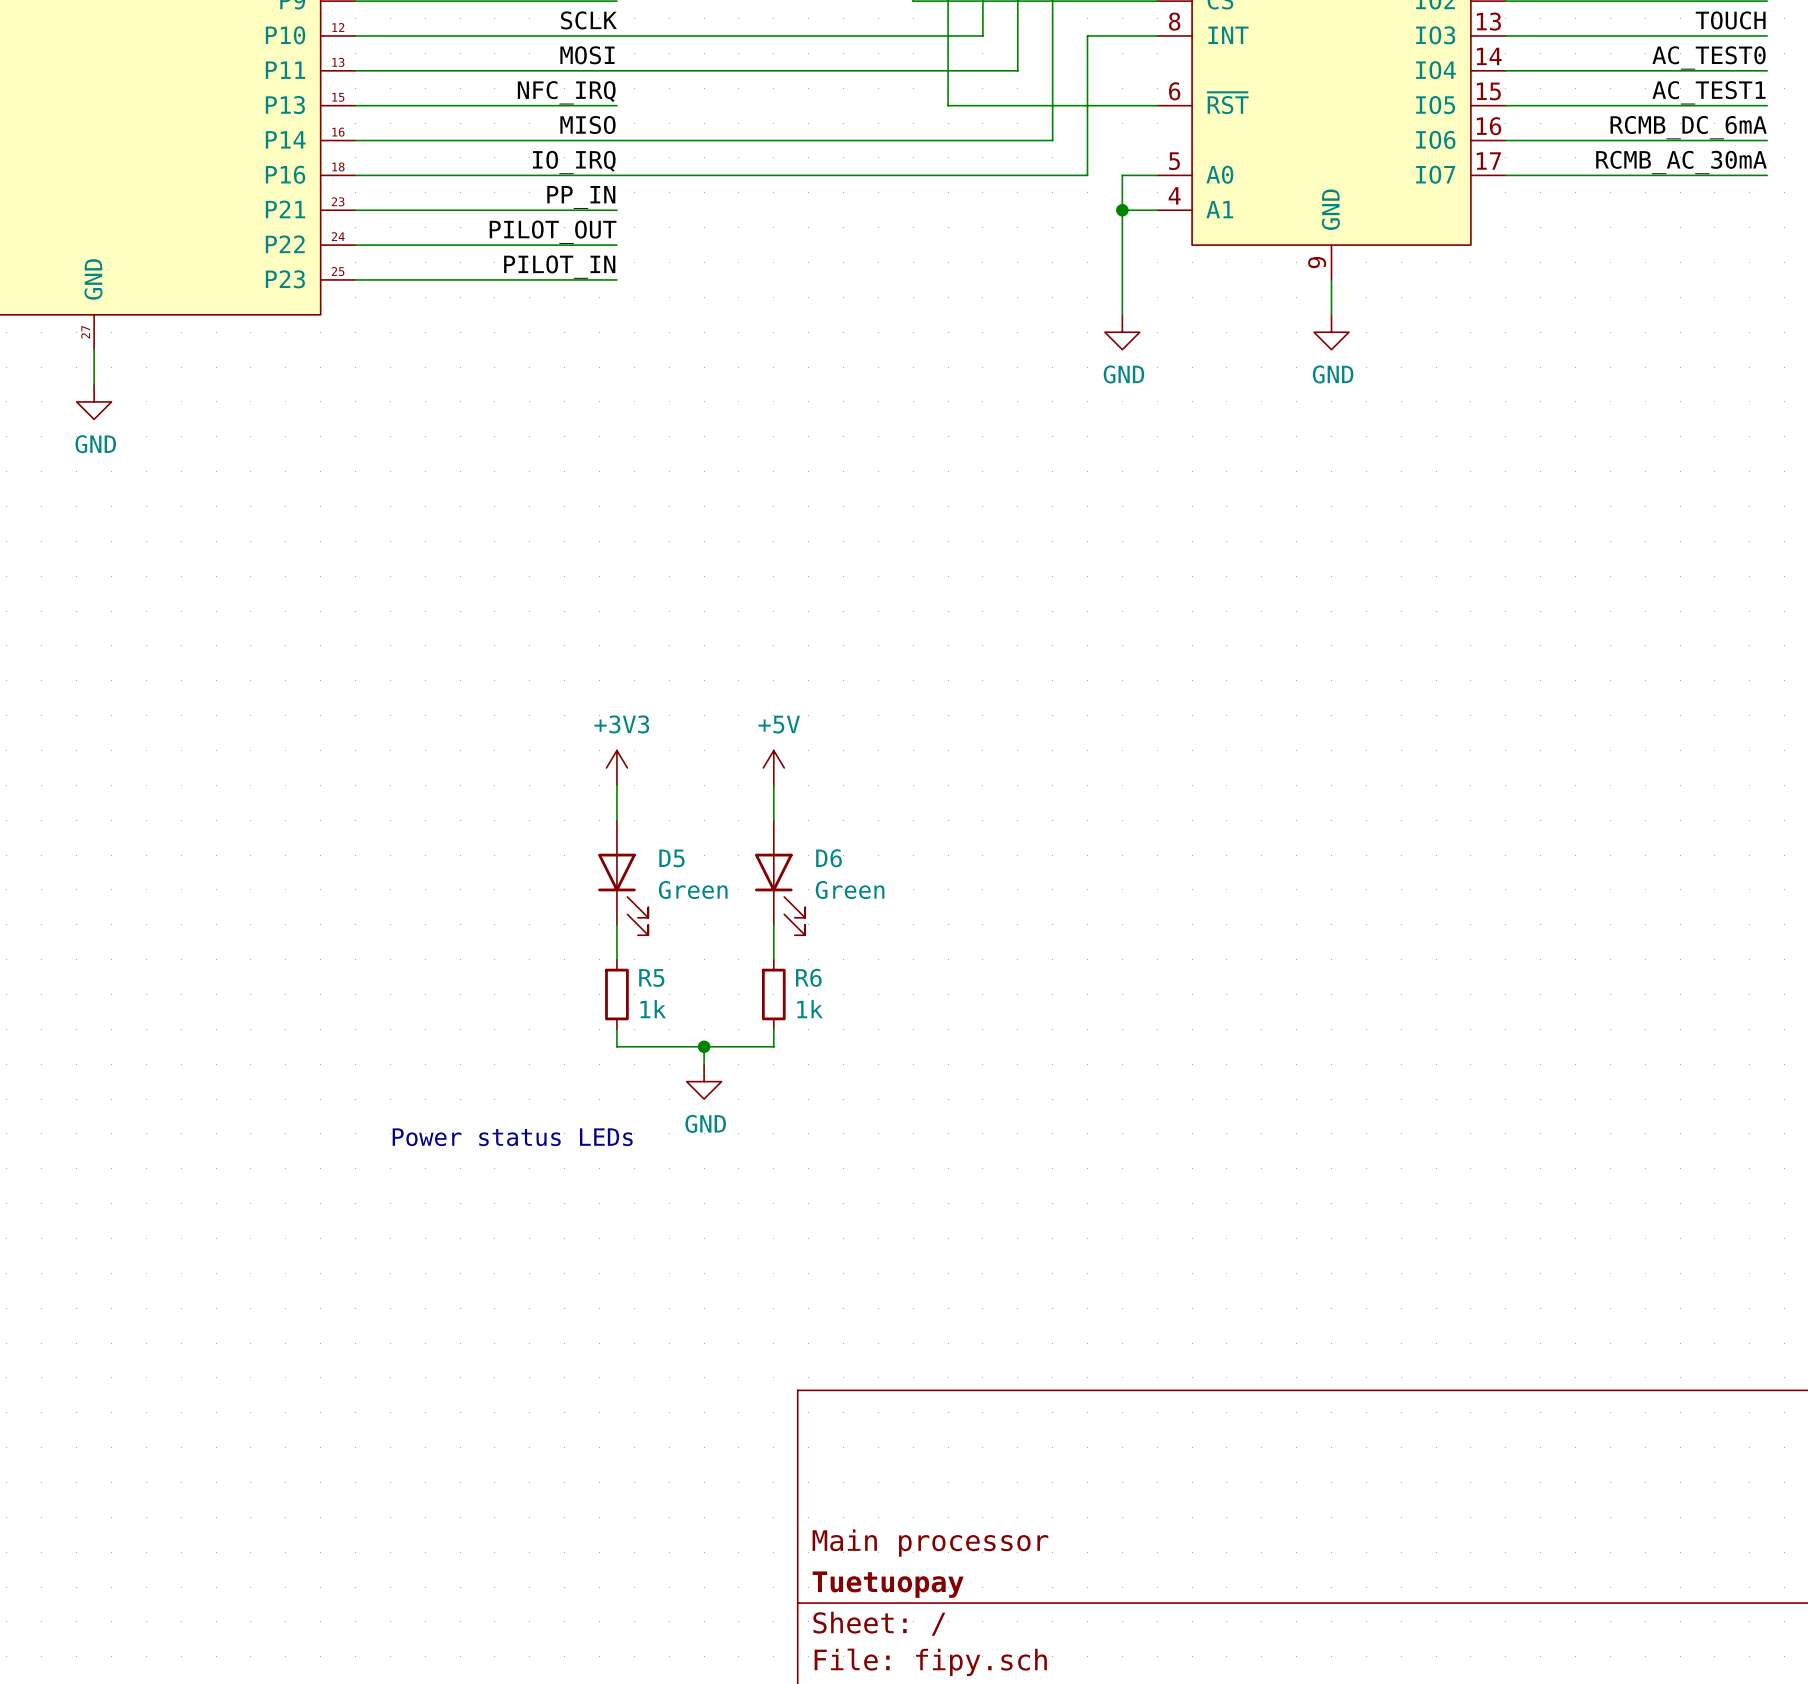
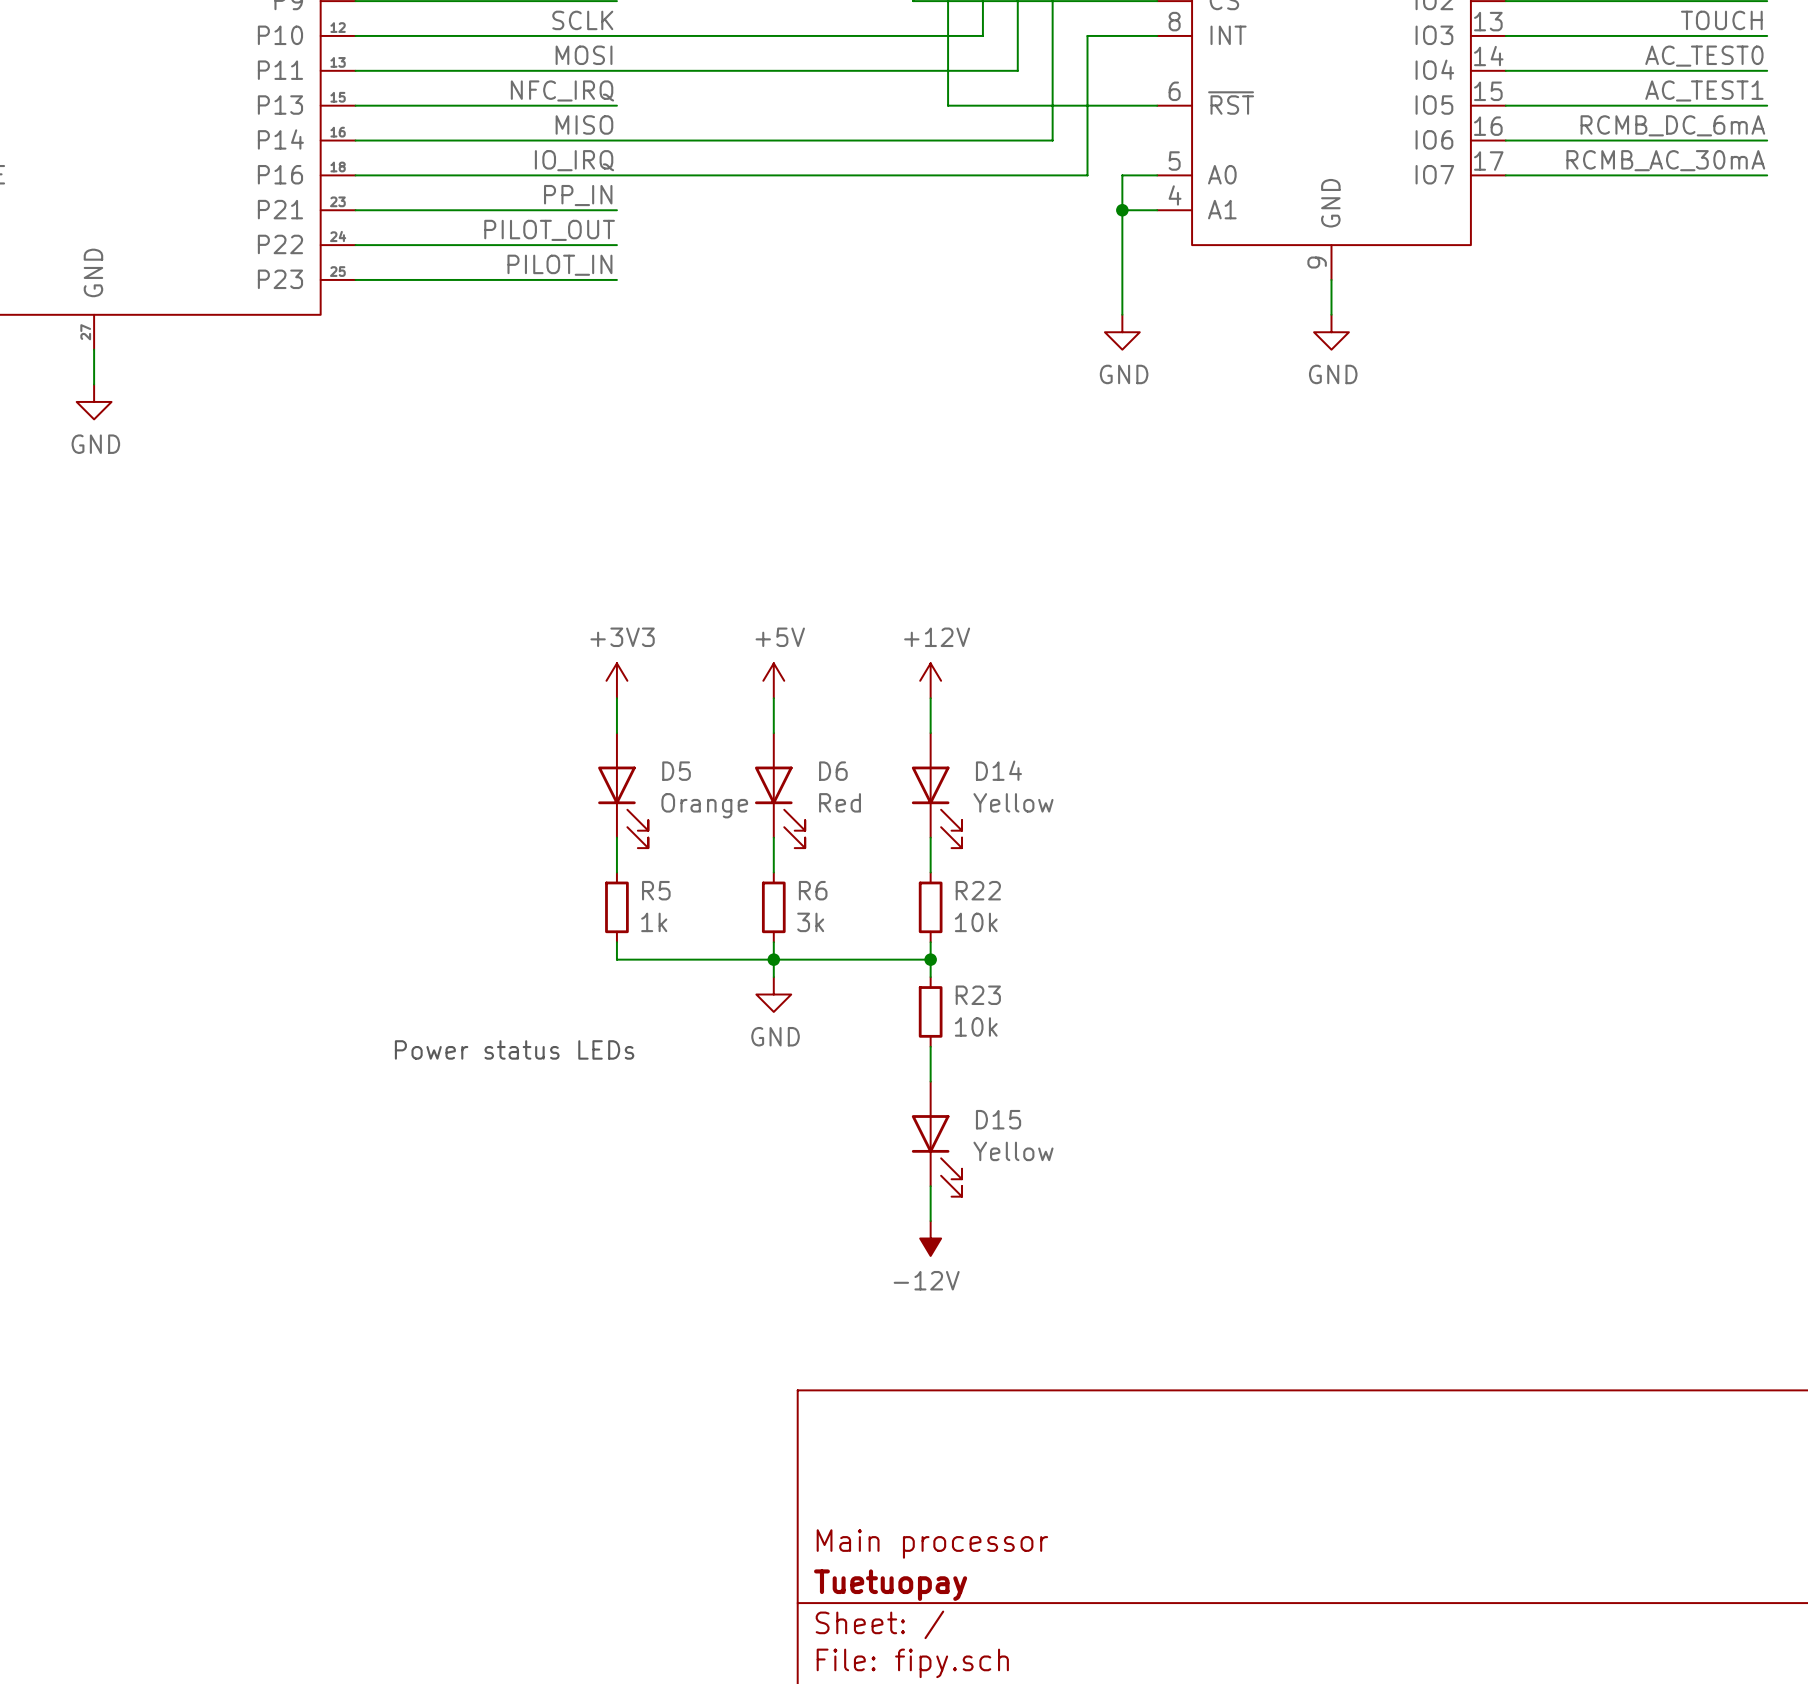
power symbol: none -> +12V (930, 680)
wire: none -> (616, 698) (616, 733)
wire: none -> (773, 698) (773, 733)
wire: none -> (930, 698) (930, 733)
power symbol position: +3V3 (616, 767) -> +3V3 (616, 680)
power symbol position: +5V (773, 767) -> +5V (773, 680)
D14: none -> Yellow (936, 790)
wire: none -> (930, 837) (930, 872)
D5 position: (623, 877) -> (623, 790)
D6 position: (780, 877) -> (780, 790)
D5 value: Green (693, 889) -> Orange (704, 805)
D6 value: Green (850, 889) -> Red (840, 802)
R22: none -> 10k (930, 907)
wire: none -> (930, 942) (930, 977)
wire: none -> (616, 959) (930, 959)
junction: none -> (773, 959)
junction: none -> (930, 959)
R5 position: (616, 994) -> (616, 907)
R6 position: (773, 994) -> (773, 907)
R6 value: 1k (810, 1009) -> 3k (810, 922)
R23: none -> 10k (930, 1011)
wire: (616, 1029) (616, 1046) (773, 1046) (773, 1029) -> none
wire: (704, 1046) (704, 1064) -> none
junction: (704, 1046) -> none
wire: none -> (930, 1046) (930, 1081)
power symbol position: GND (704, 1081) -> GND (773, 994)
text position: Power status LEDs (512, 1137) -> Power status LEDs (514, 1049)
D15: none -> Yellow (936, 1139)
wire: none -> (930, 1186) (930, 1221)
power symbol: none -> -12V (930, 1238)

